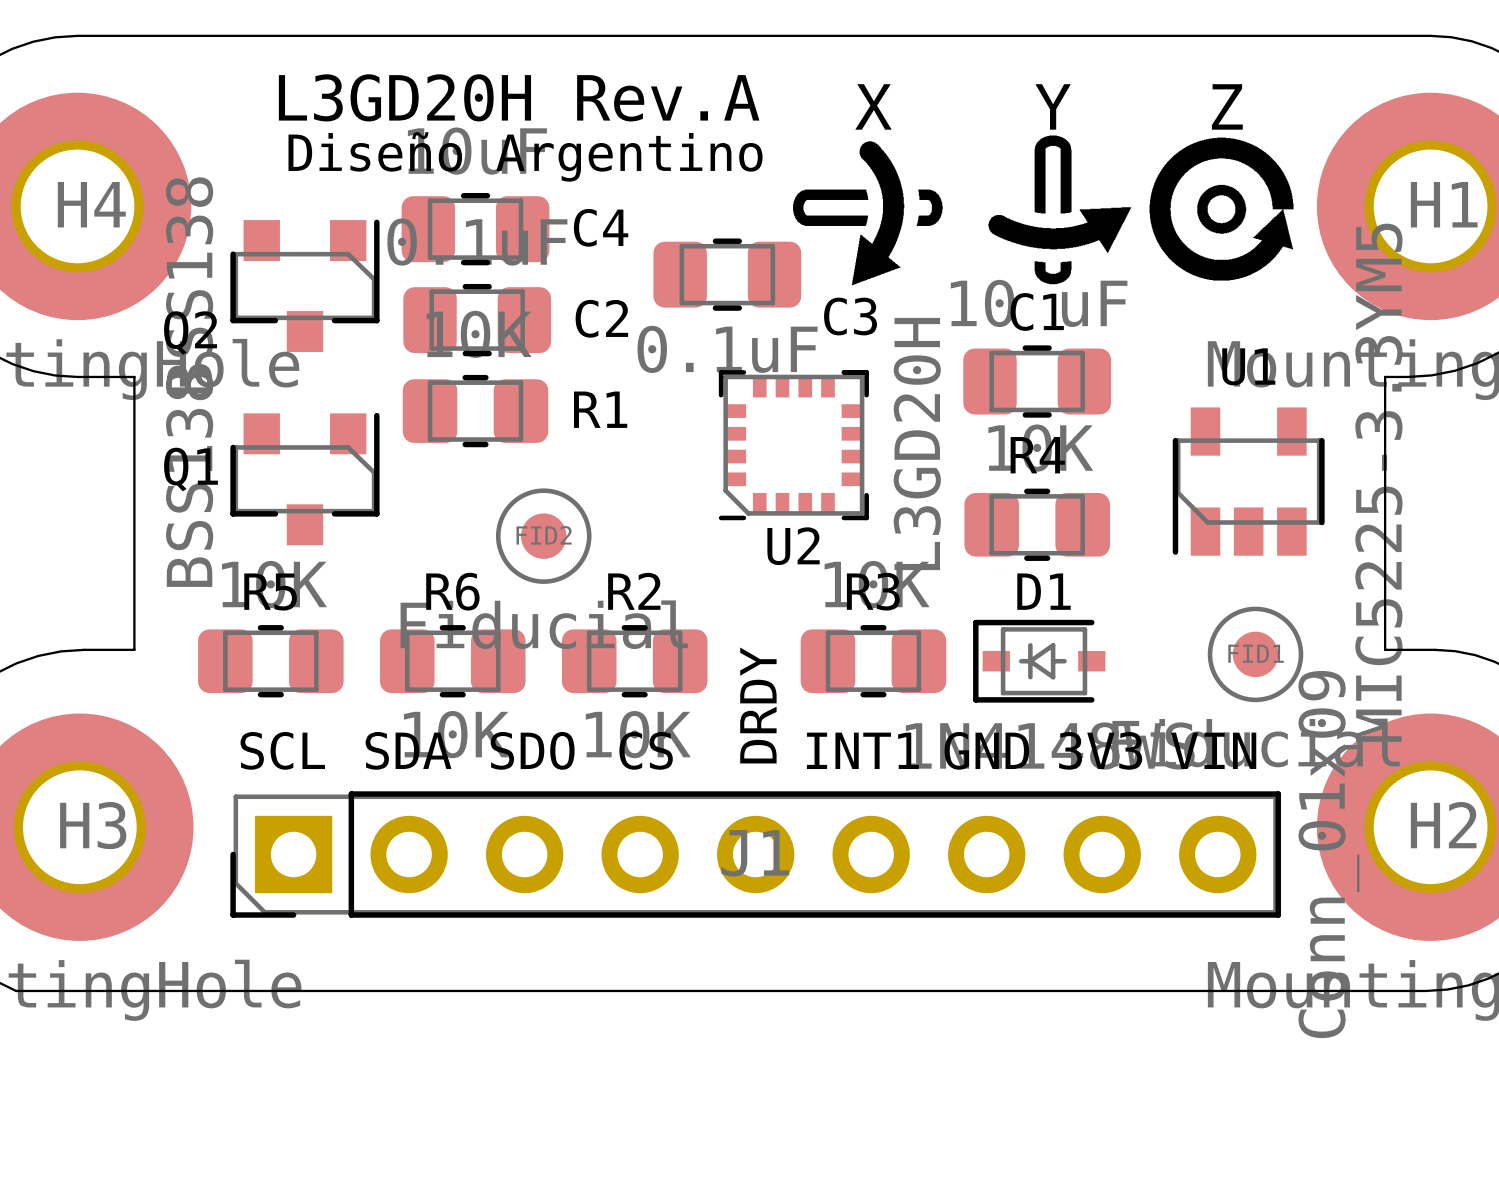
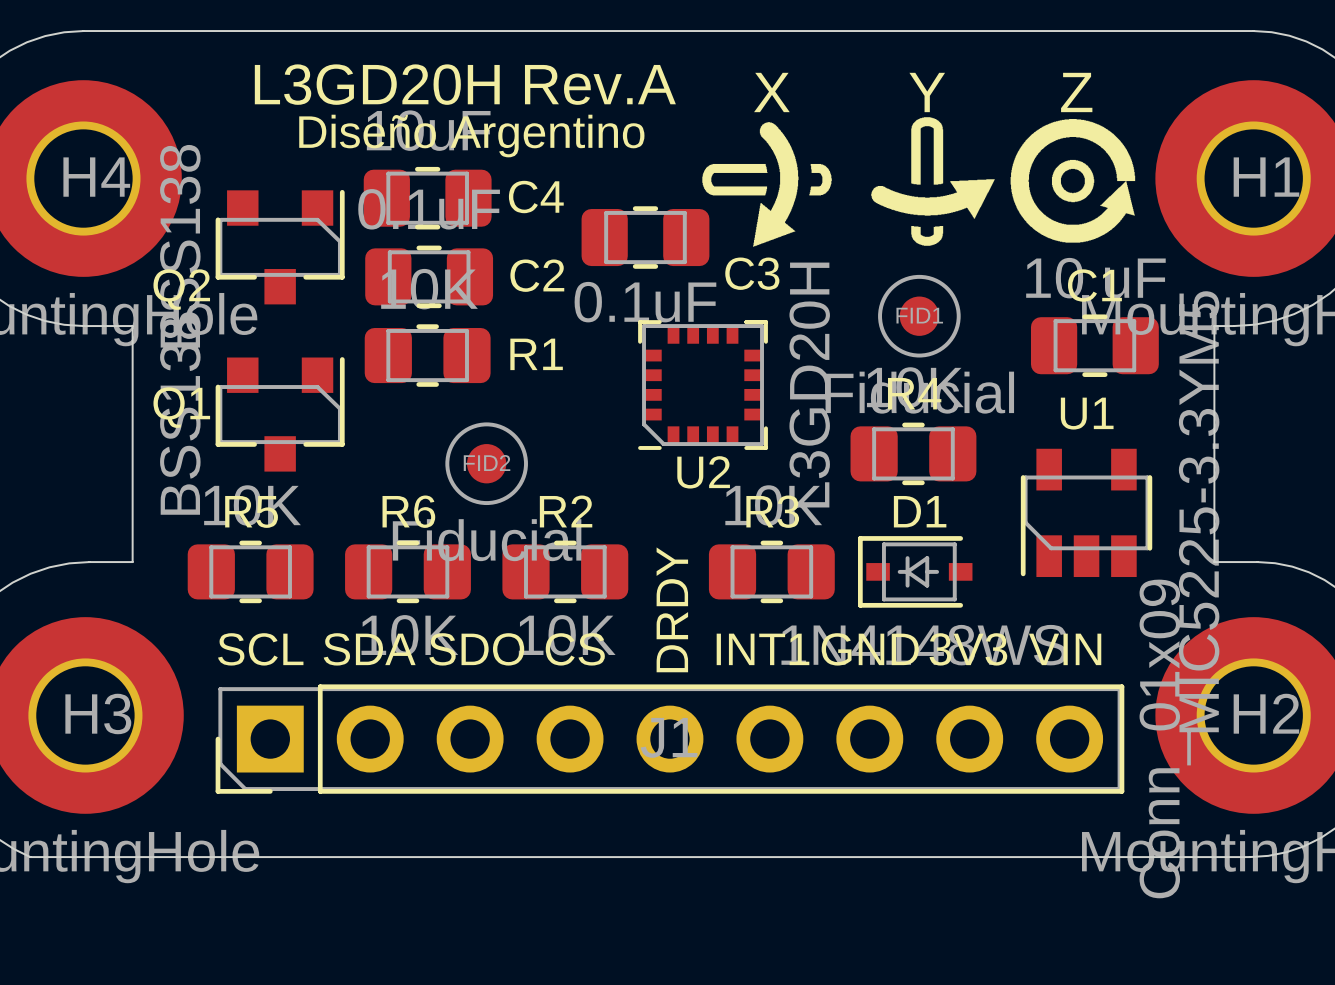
C1 position: (1037, 381) -> (1094, 345)
U1 position: (1248, 481) -> (1086, 512)
FID1 position: (1255, 654) -> (919, 316)

